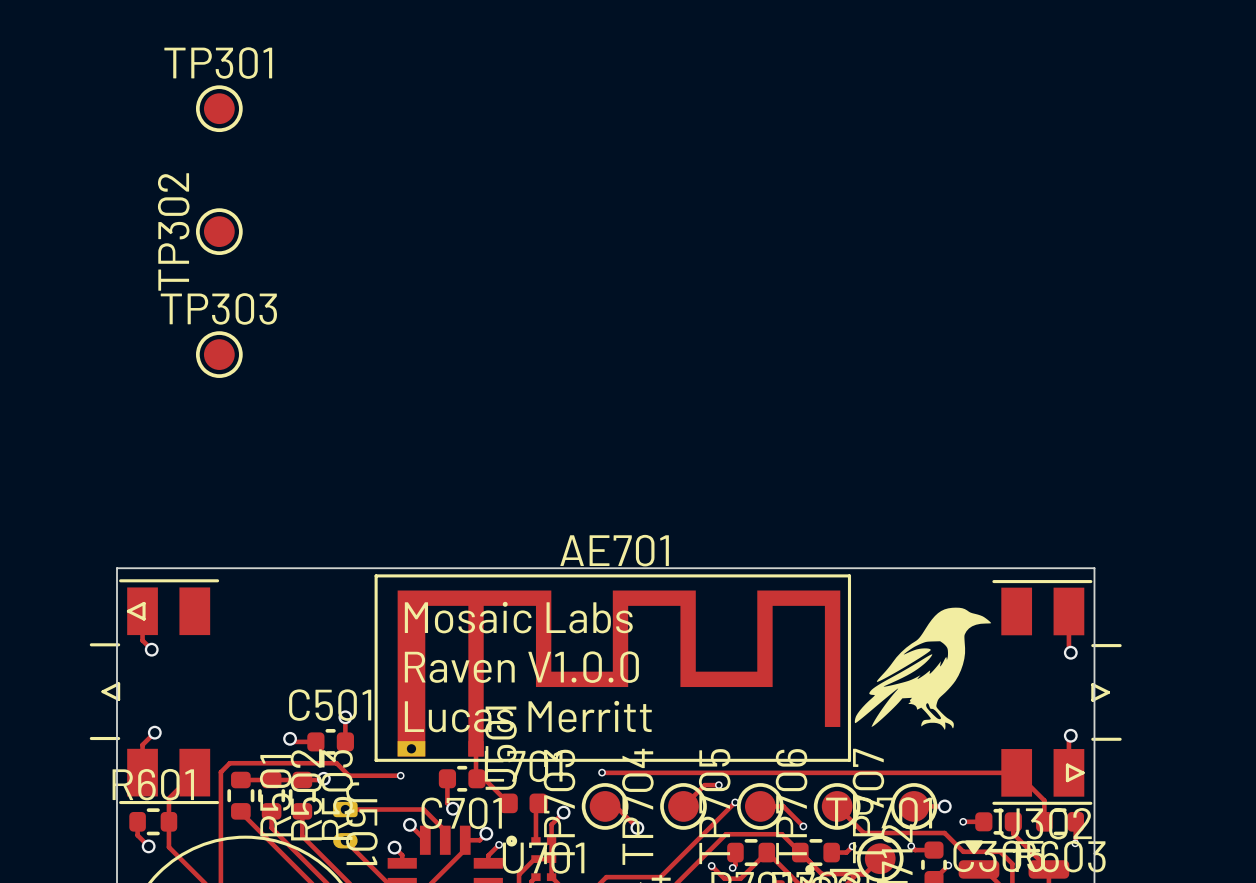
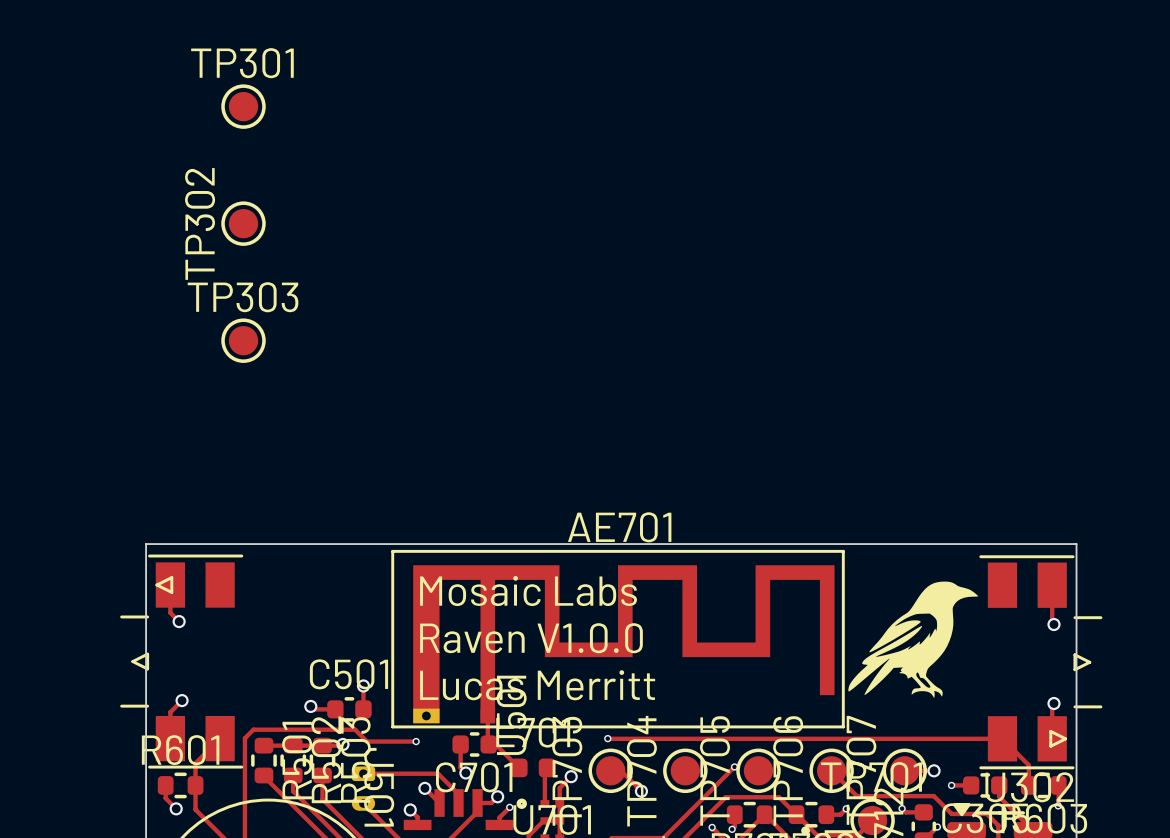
track: (718, 785) (704, 785) (683, 806) -> none
via: (718, 785) -> none
track: (760, 806) (783, 806) (803, 826) -> none
via: (803, 826) -> none

